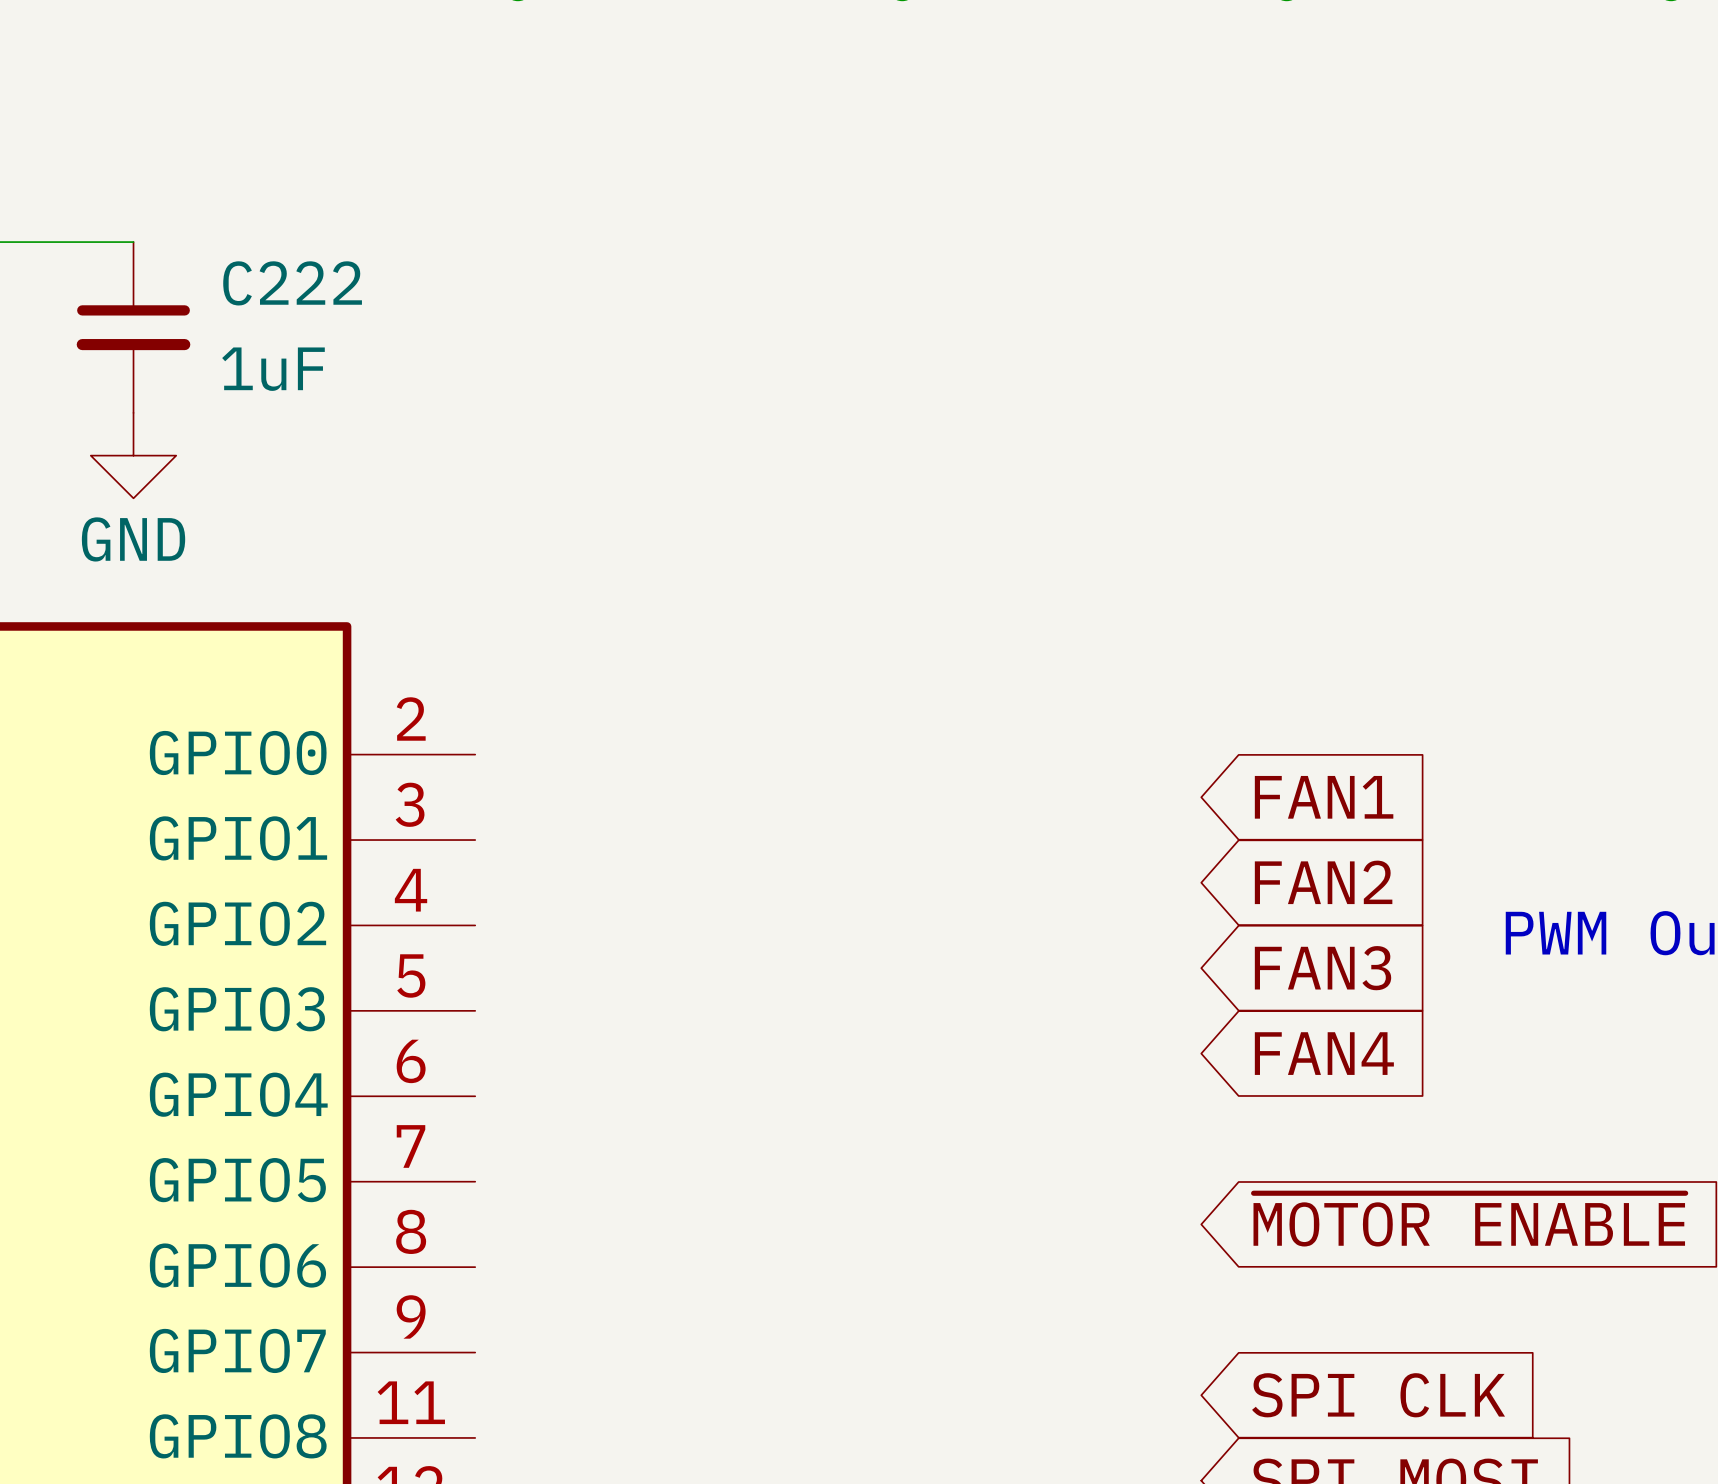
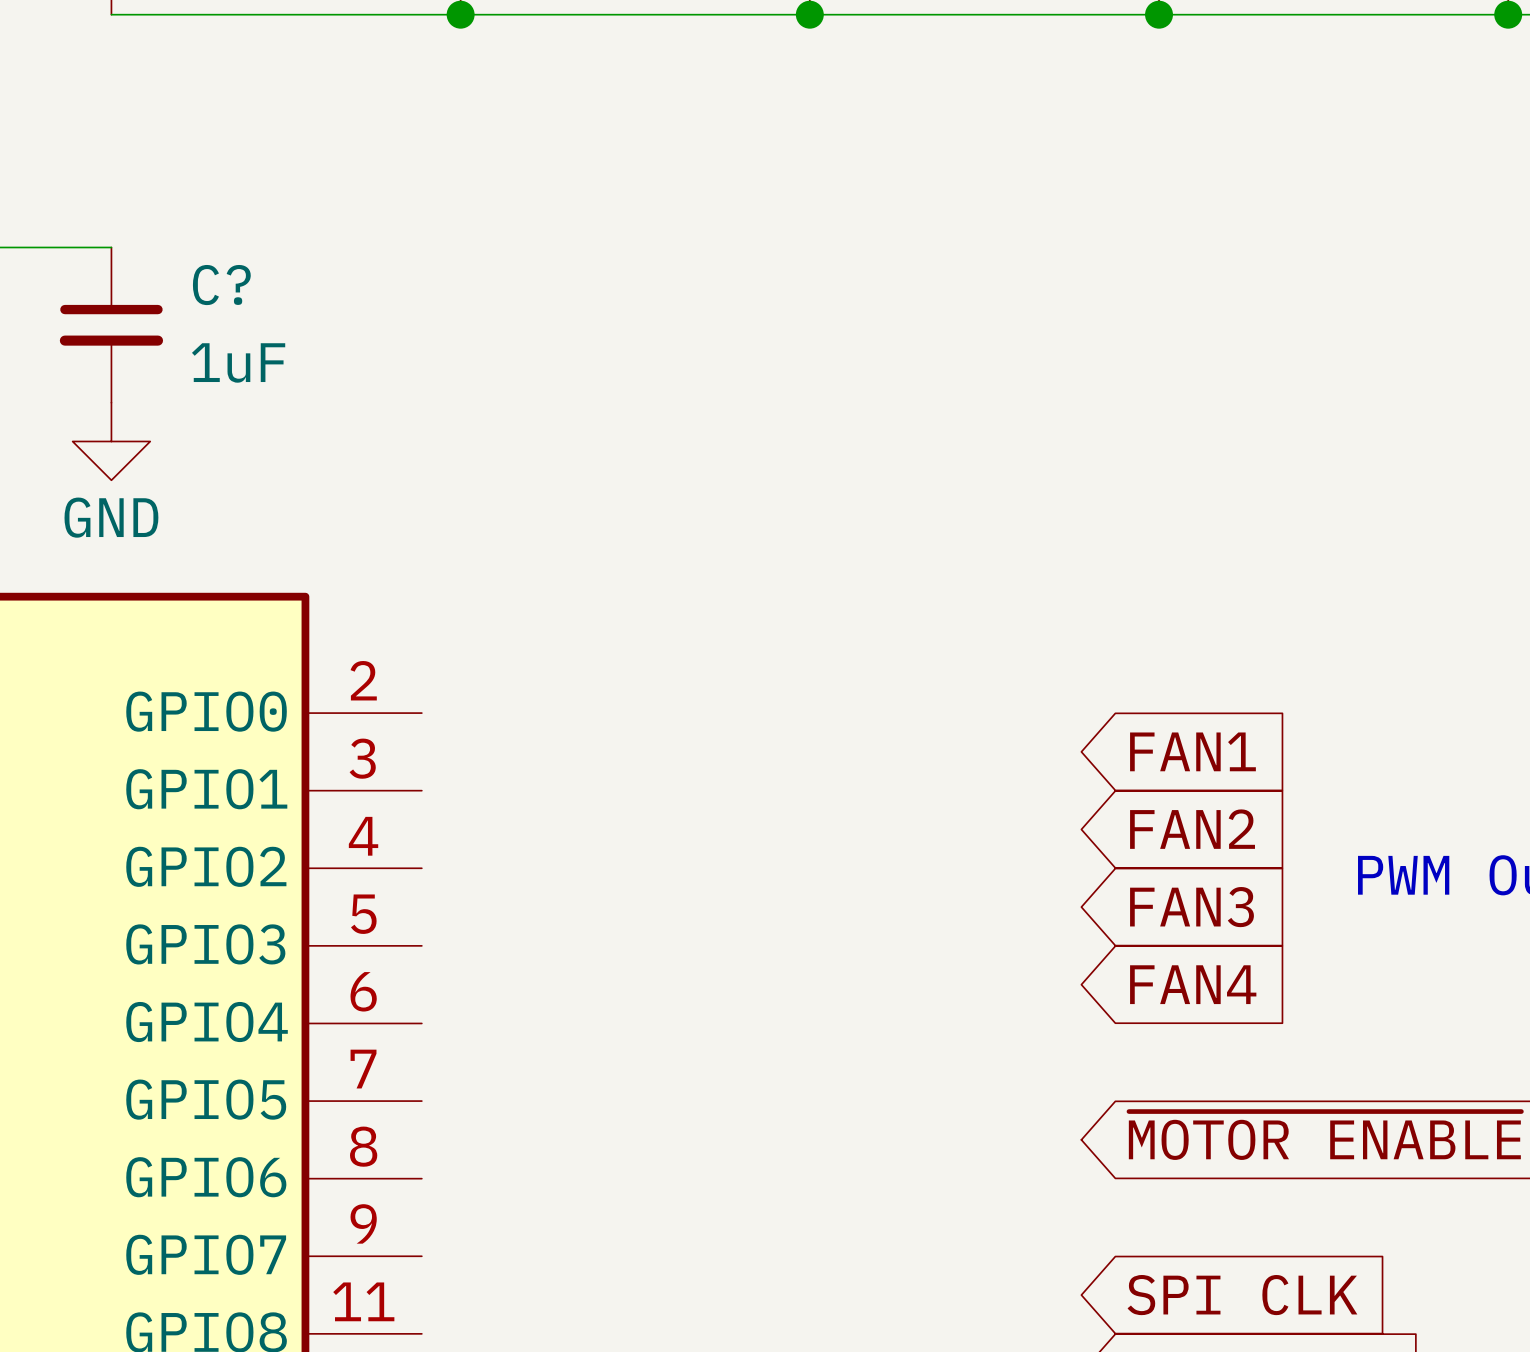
C222 name: C222 (292, 283) -> C? (221, 285)

